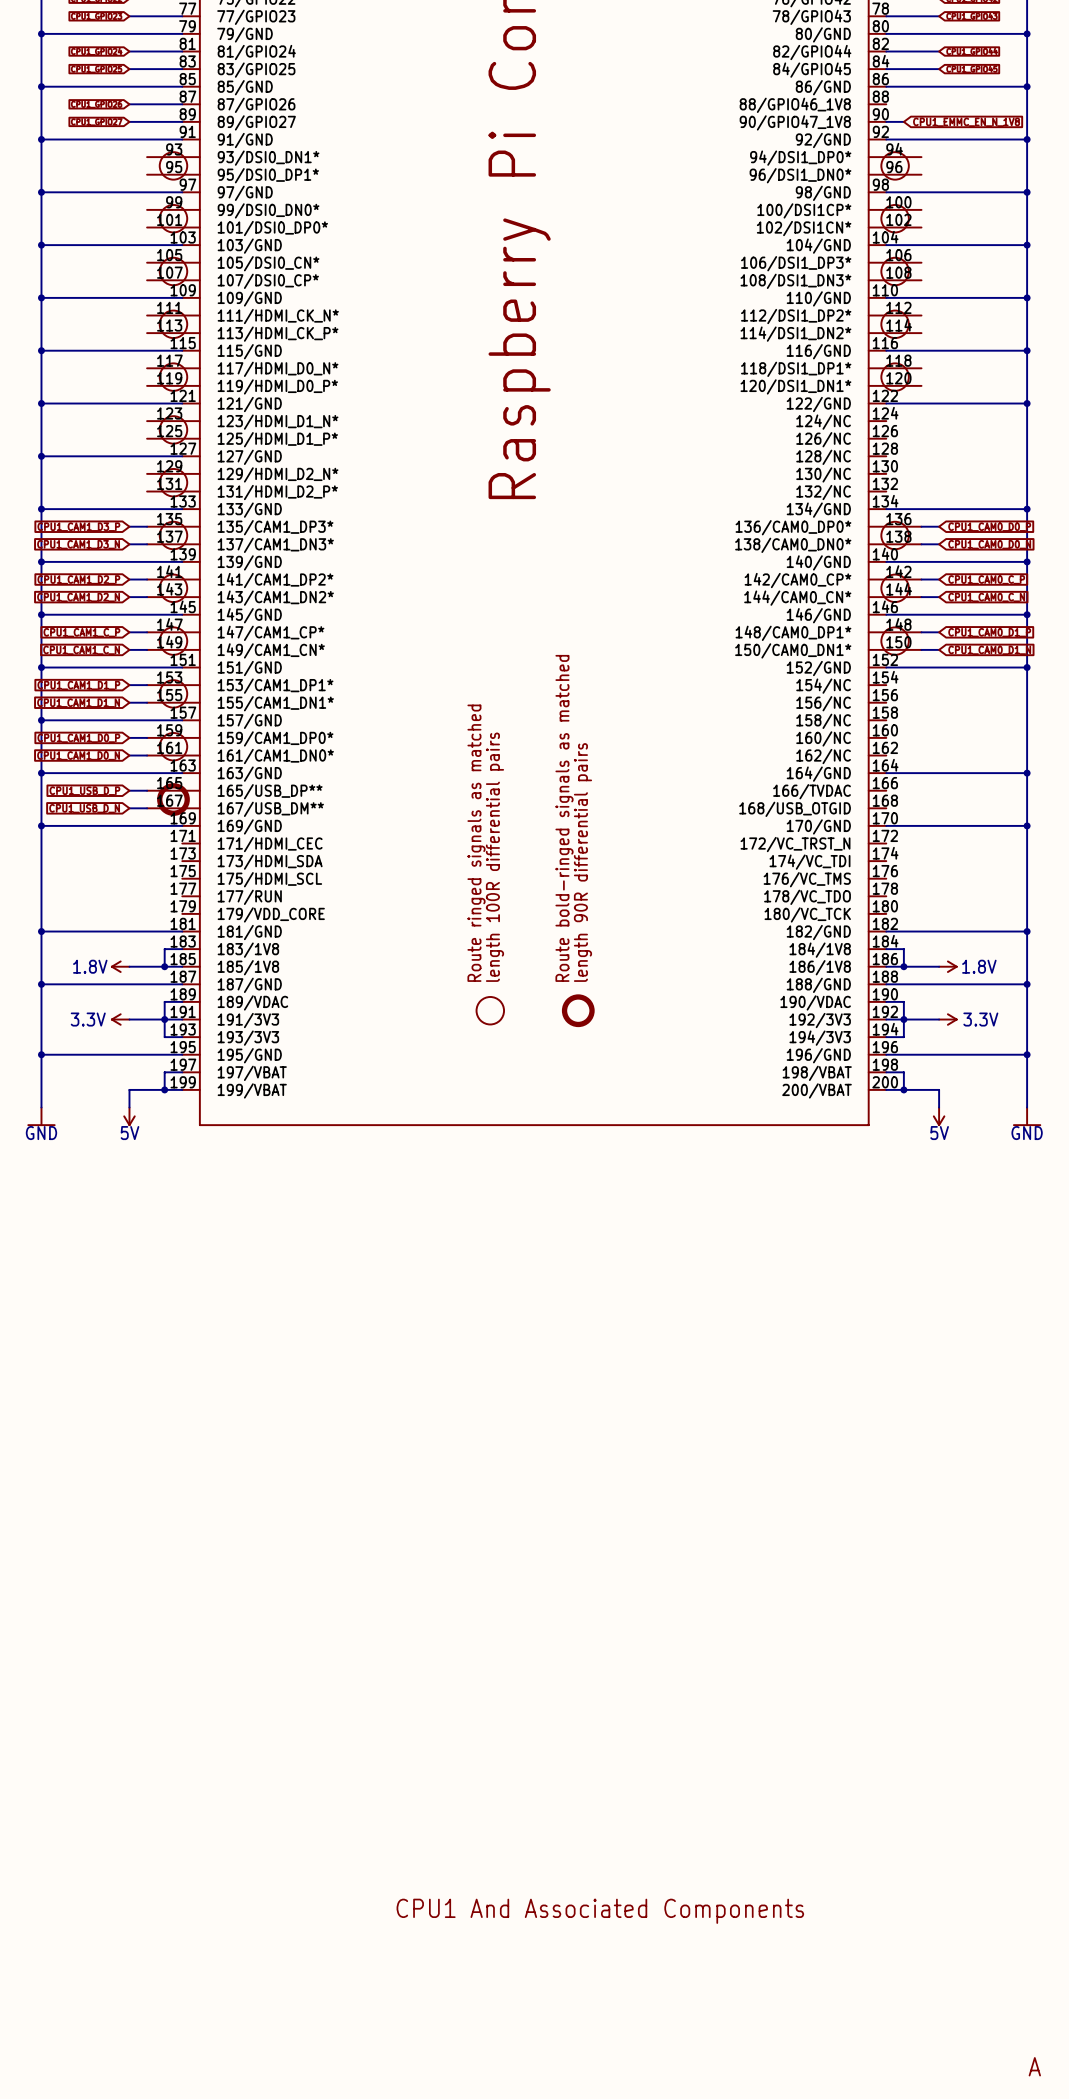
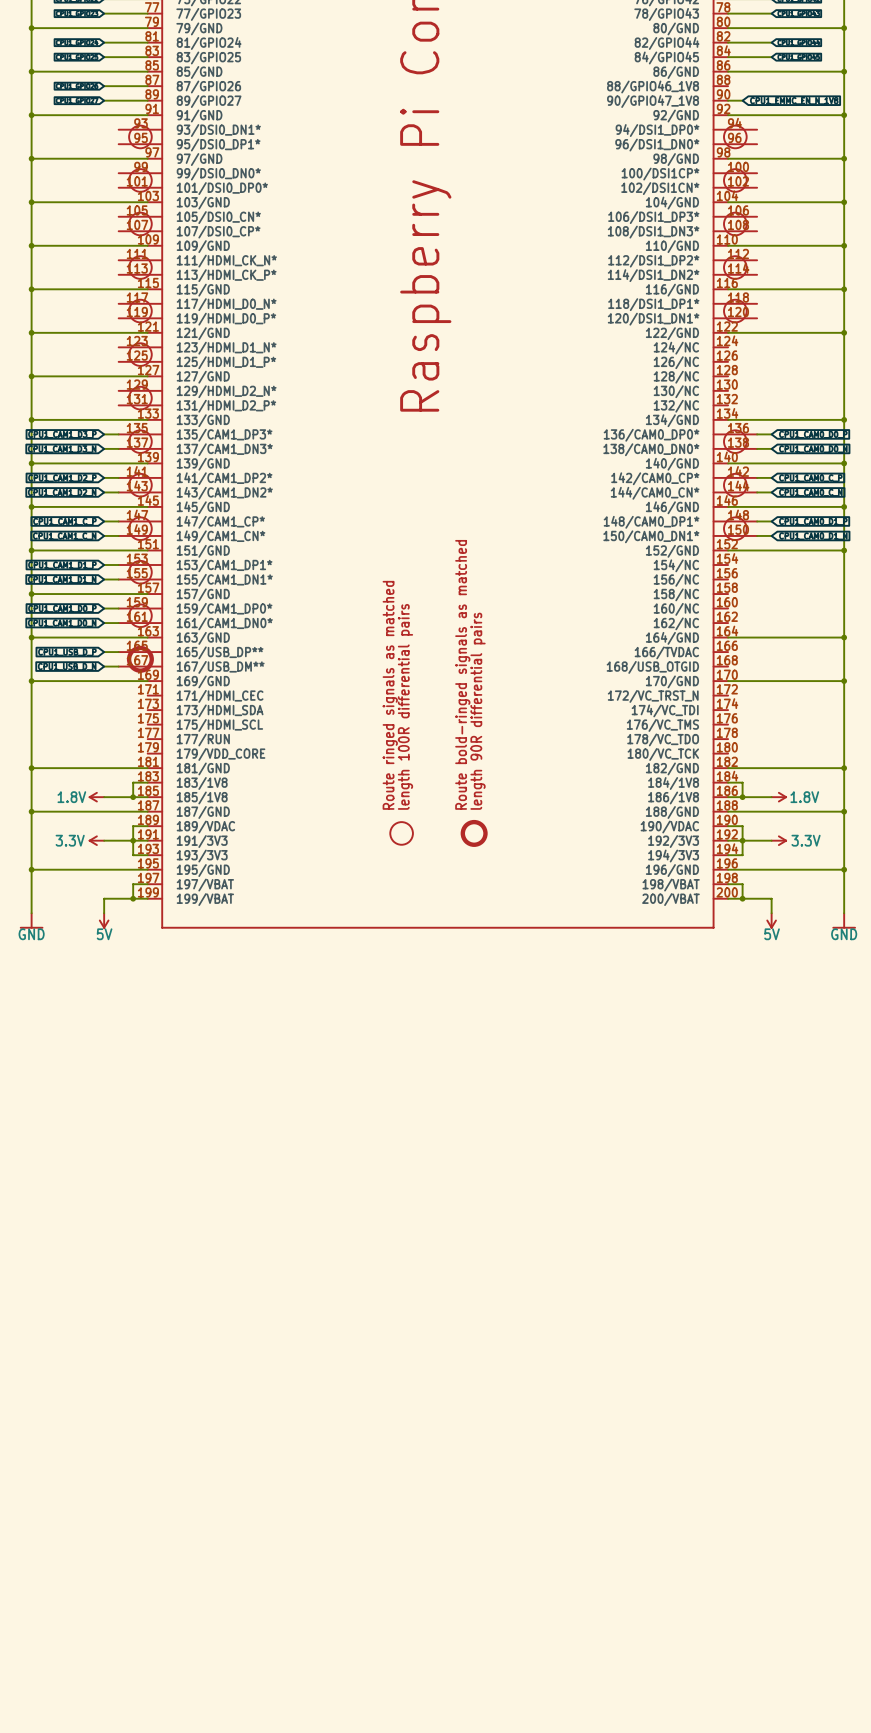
text: CPU1 And Associated Components (600, 1911) -> none
text: A (1034, 2066) -> none

